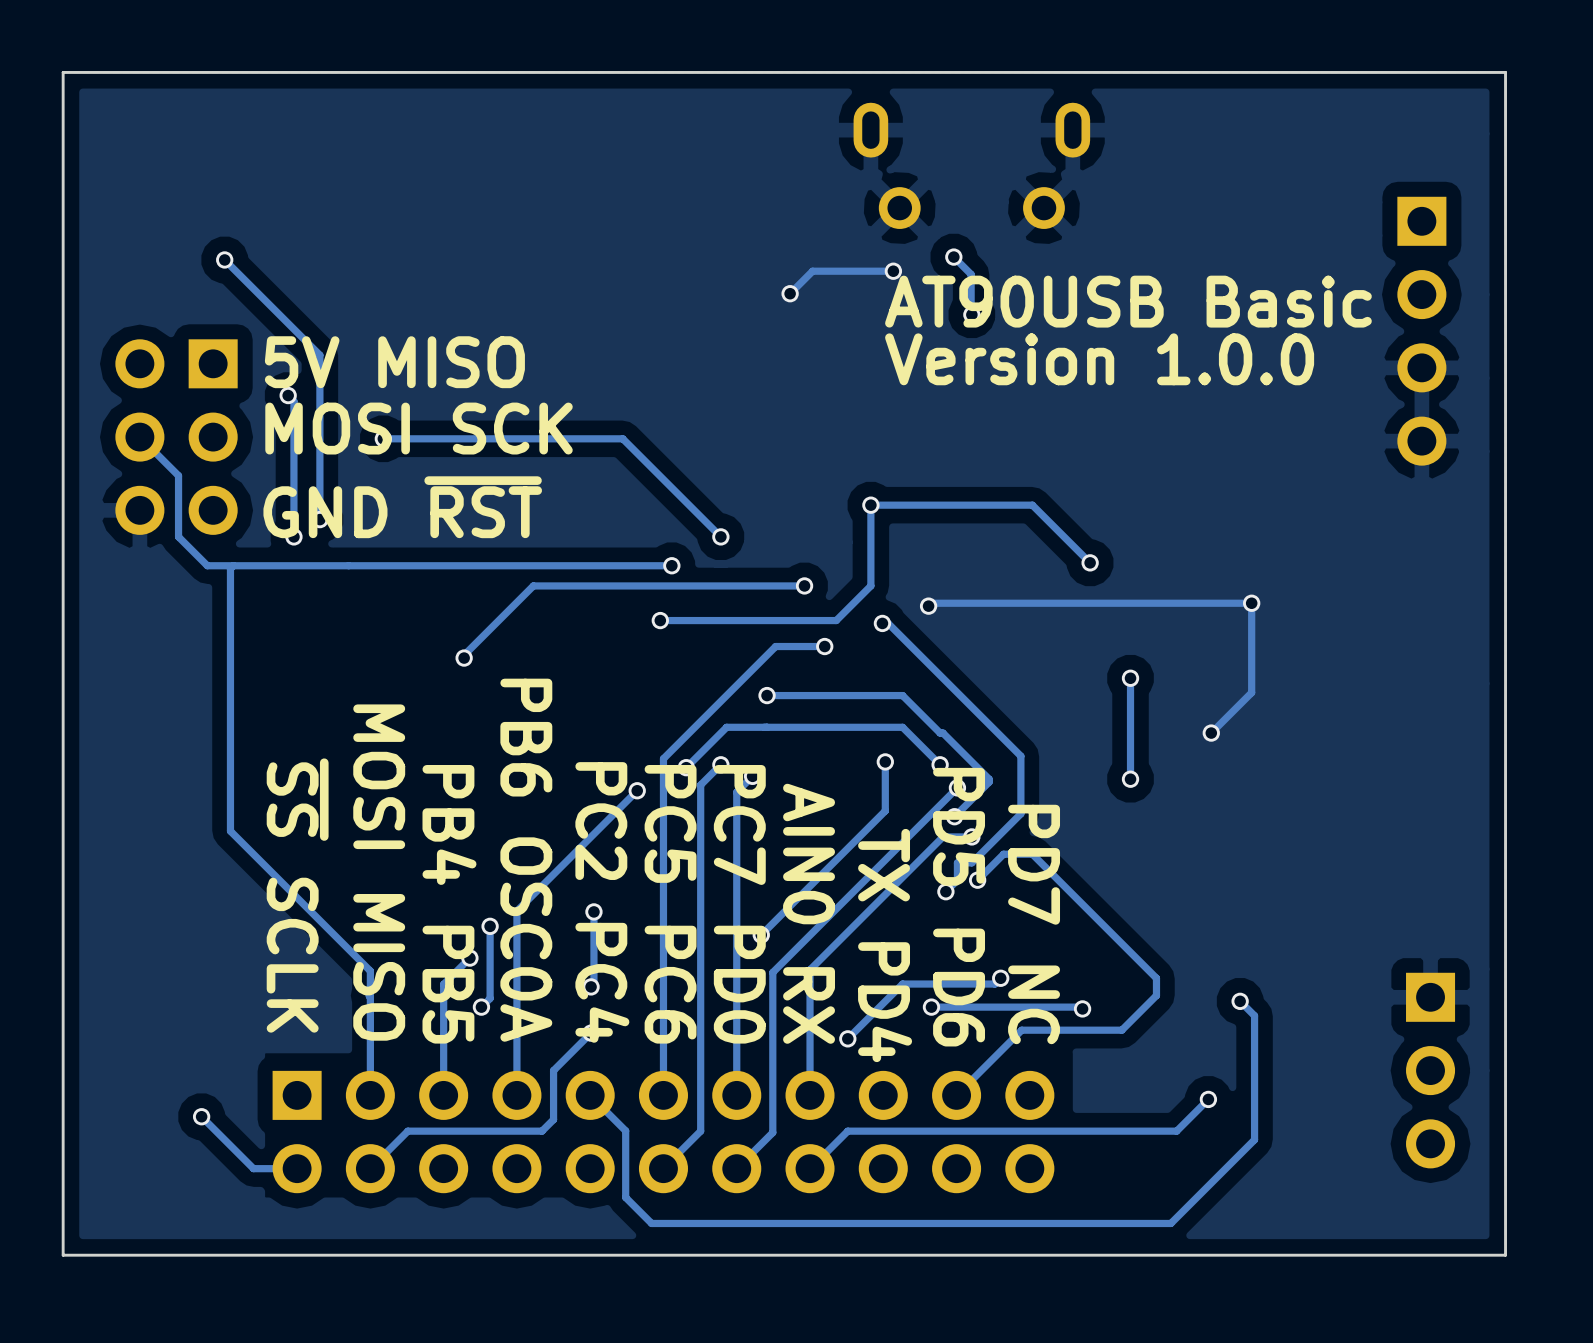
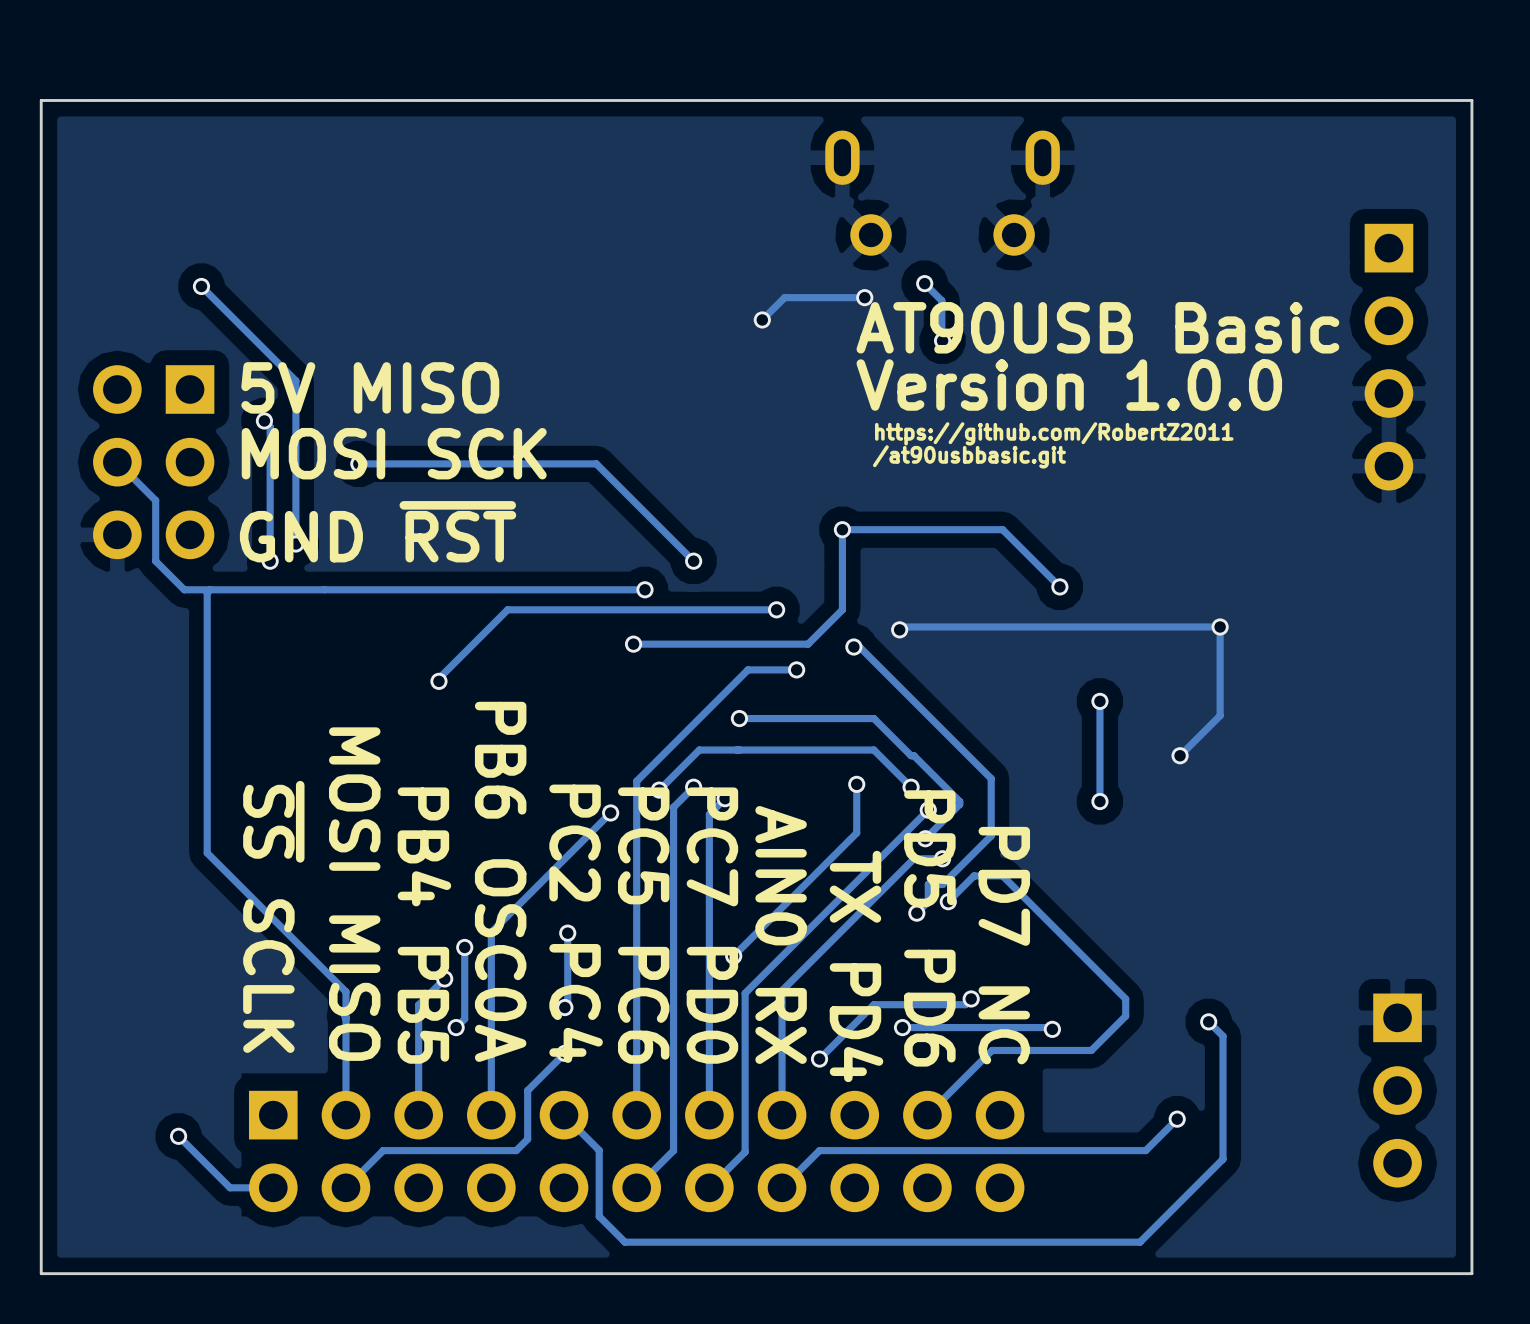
text: none -> https://github.com/RobertZ2011 (1054, 433)
text: none -> /at90usbbasic.git (969, 456)

